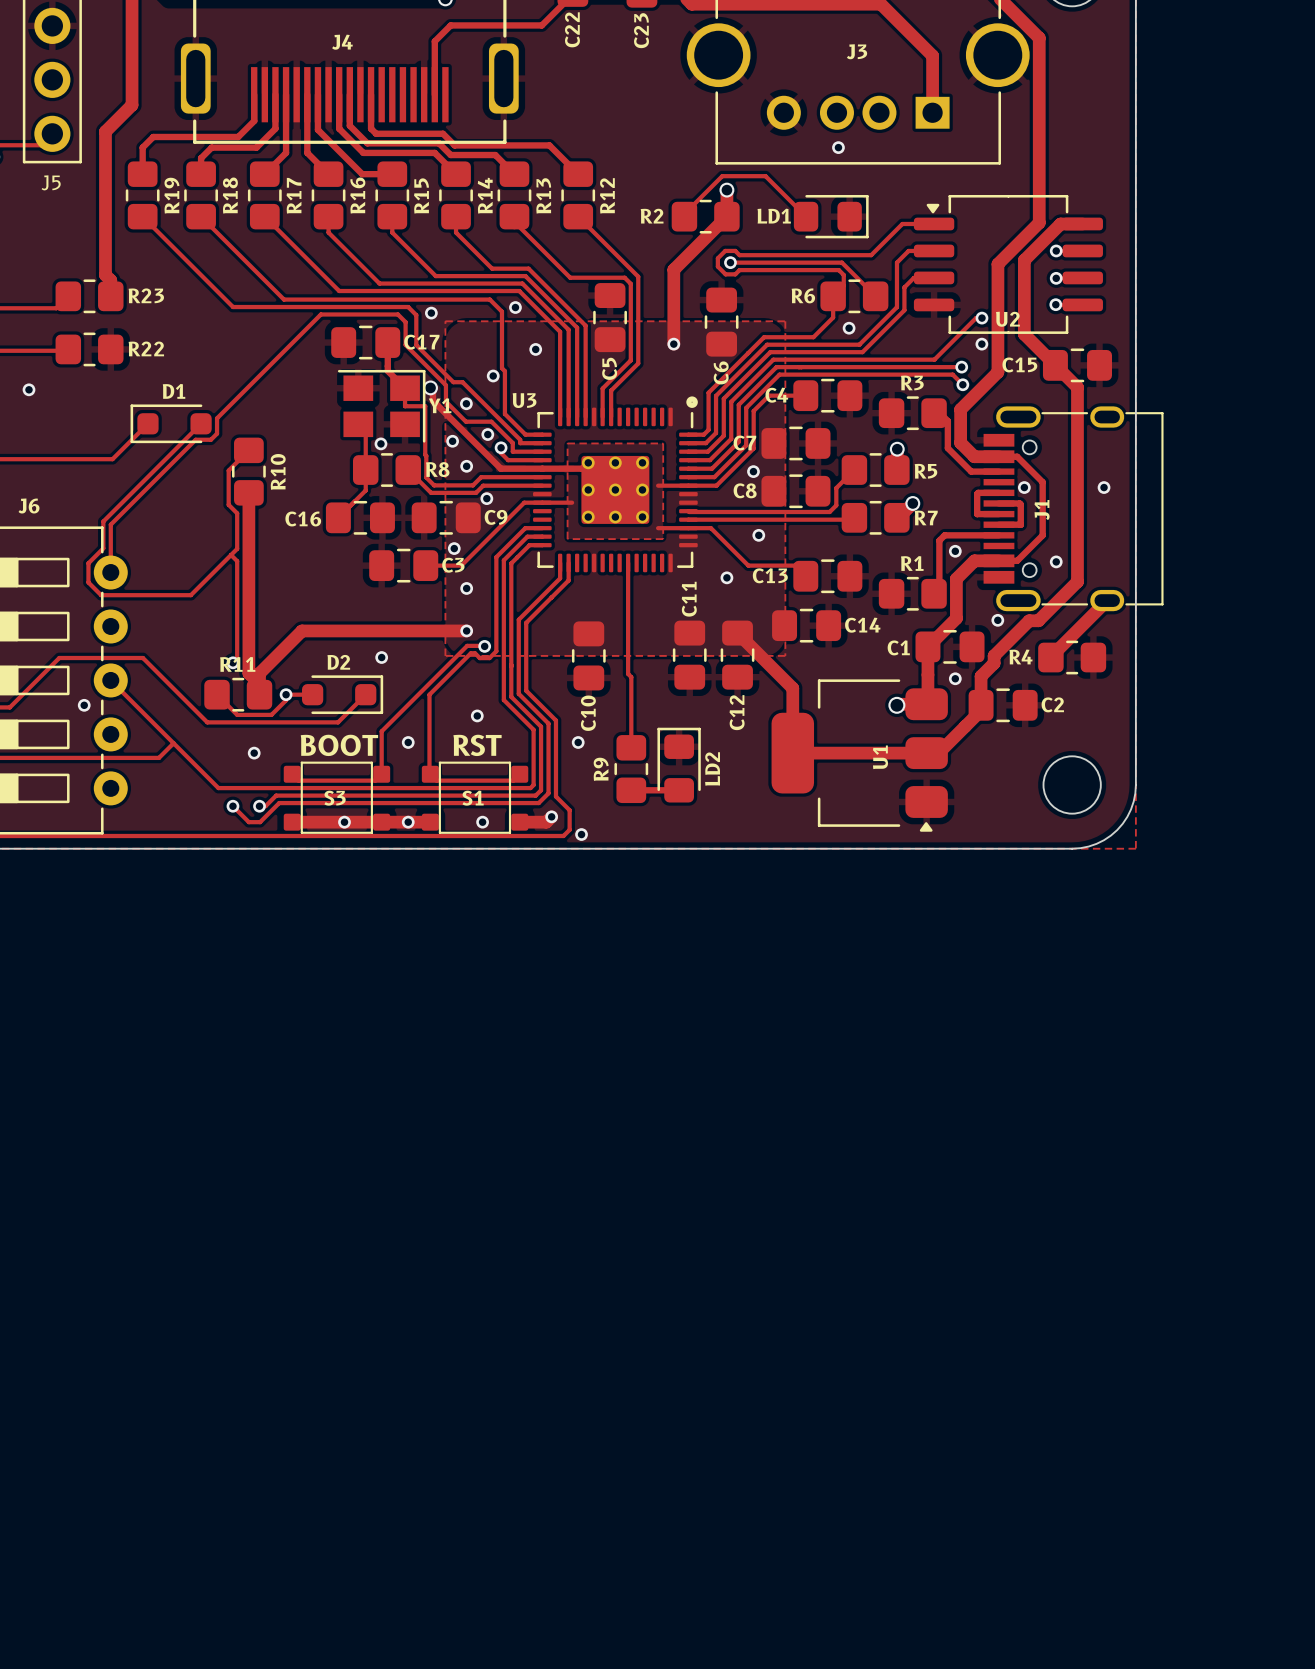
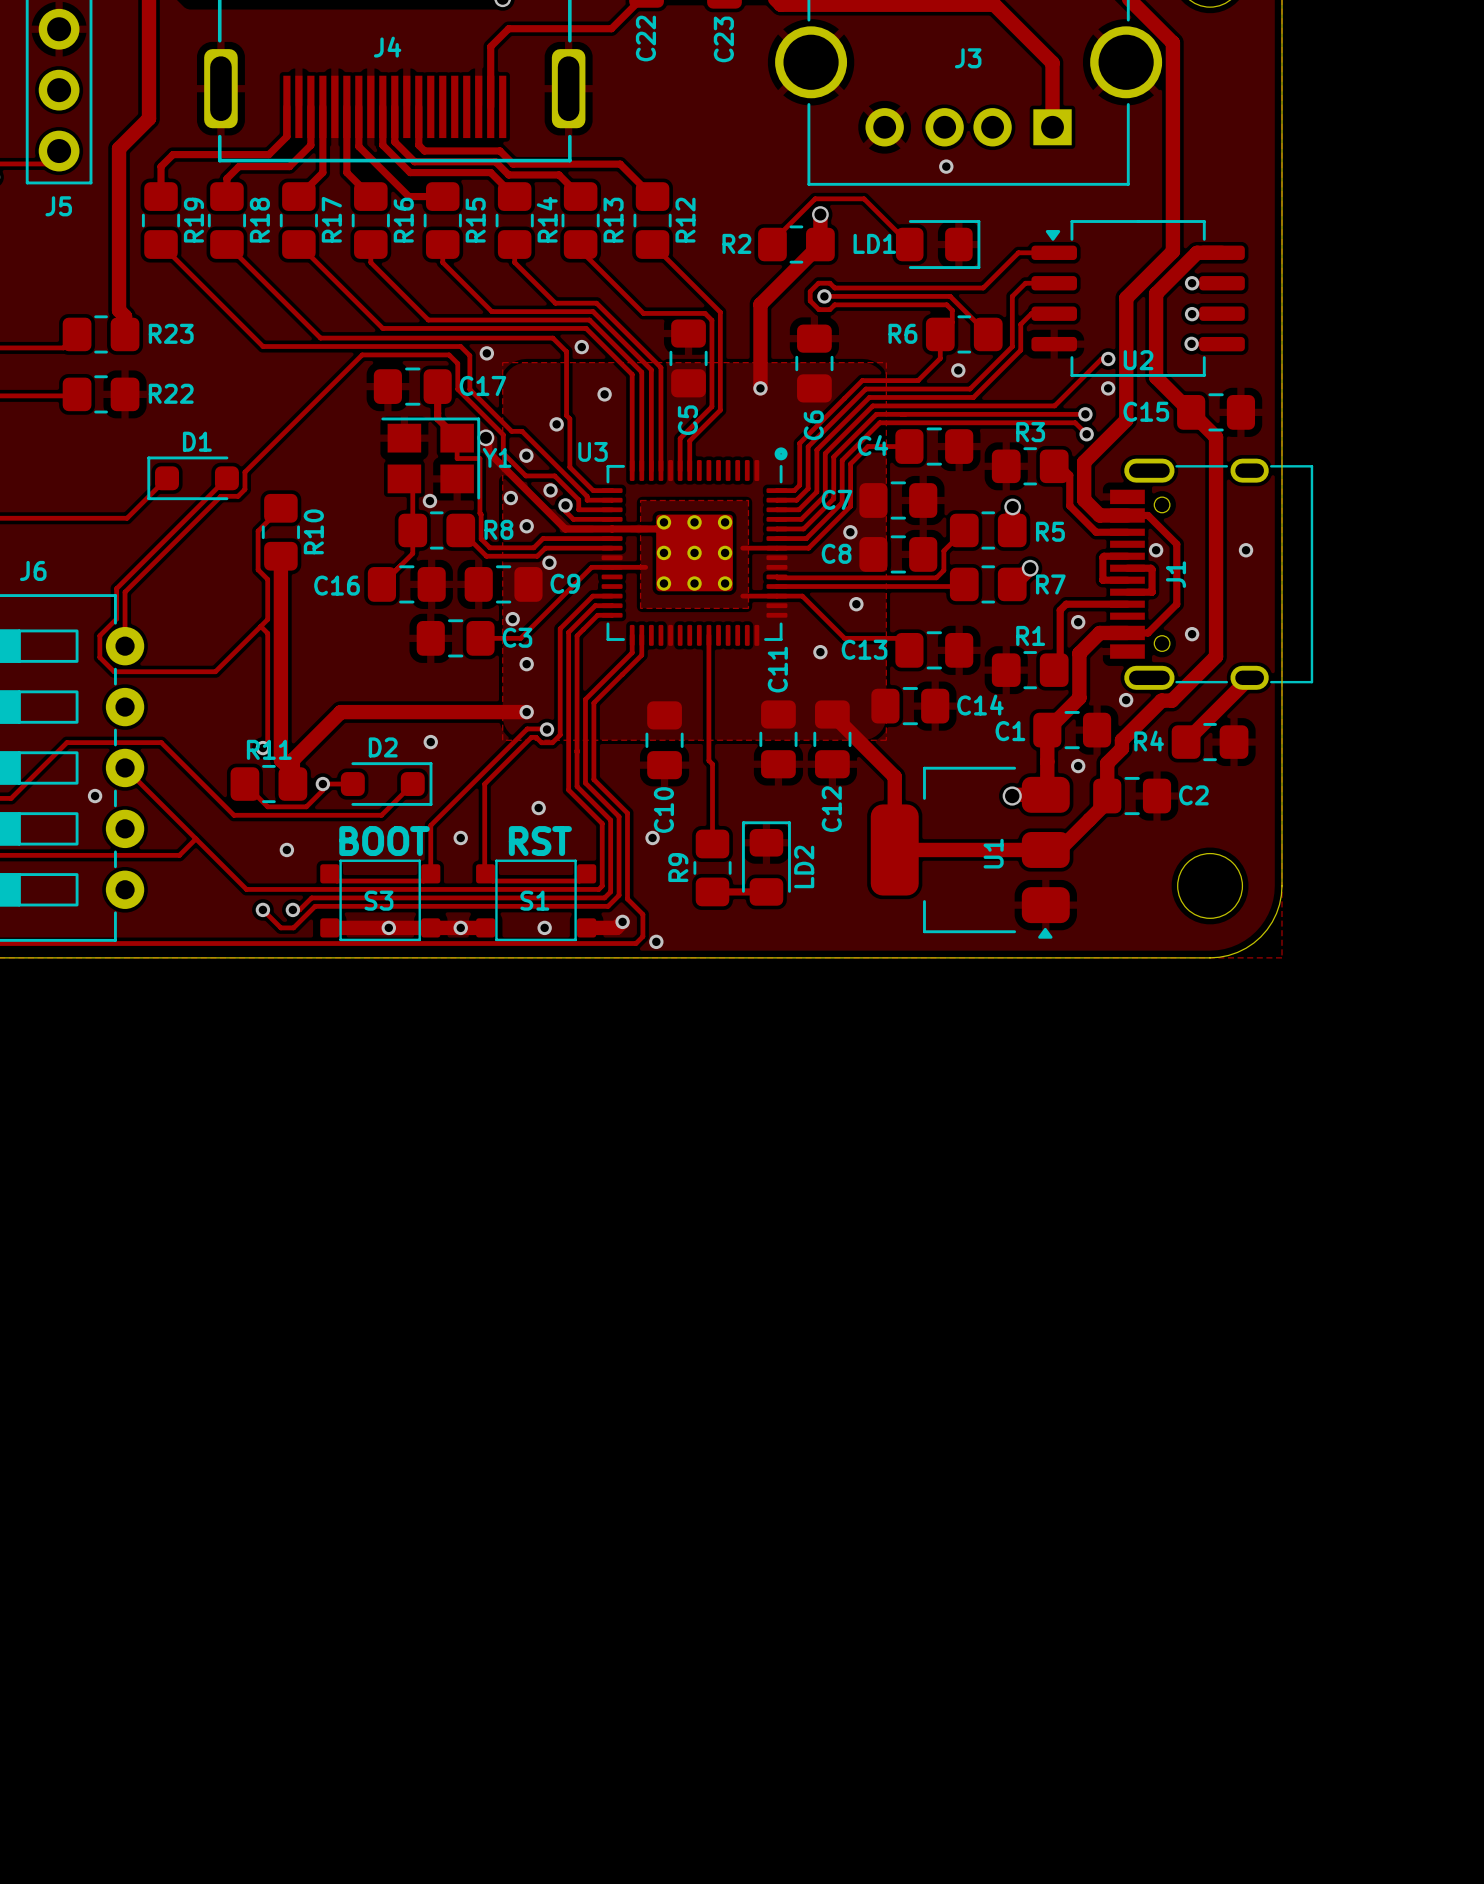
via: (28, 389) -> none

